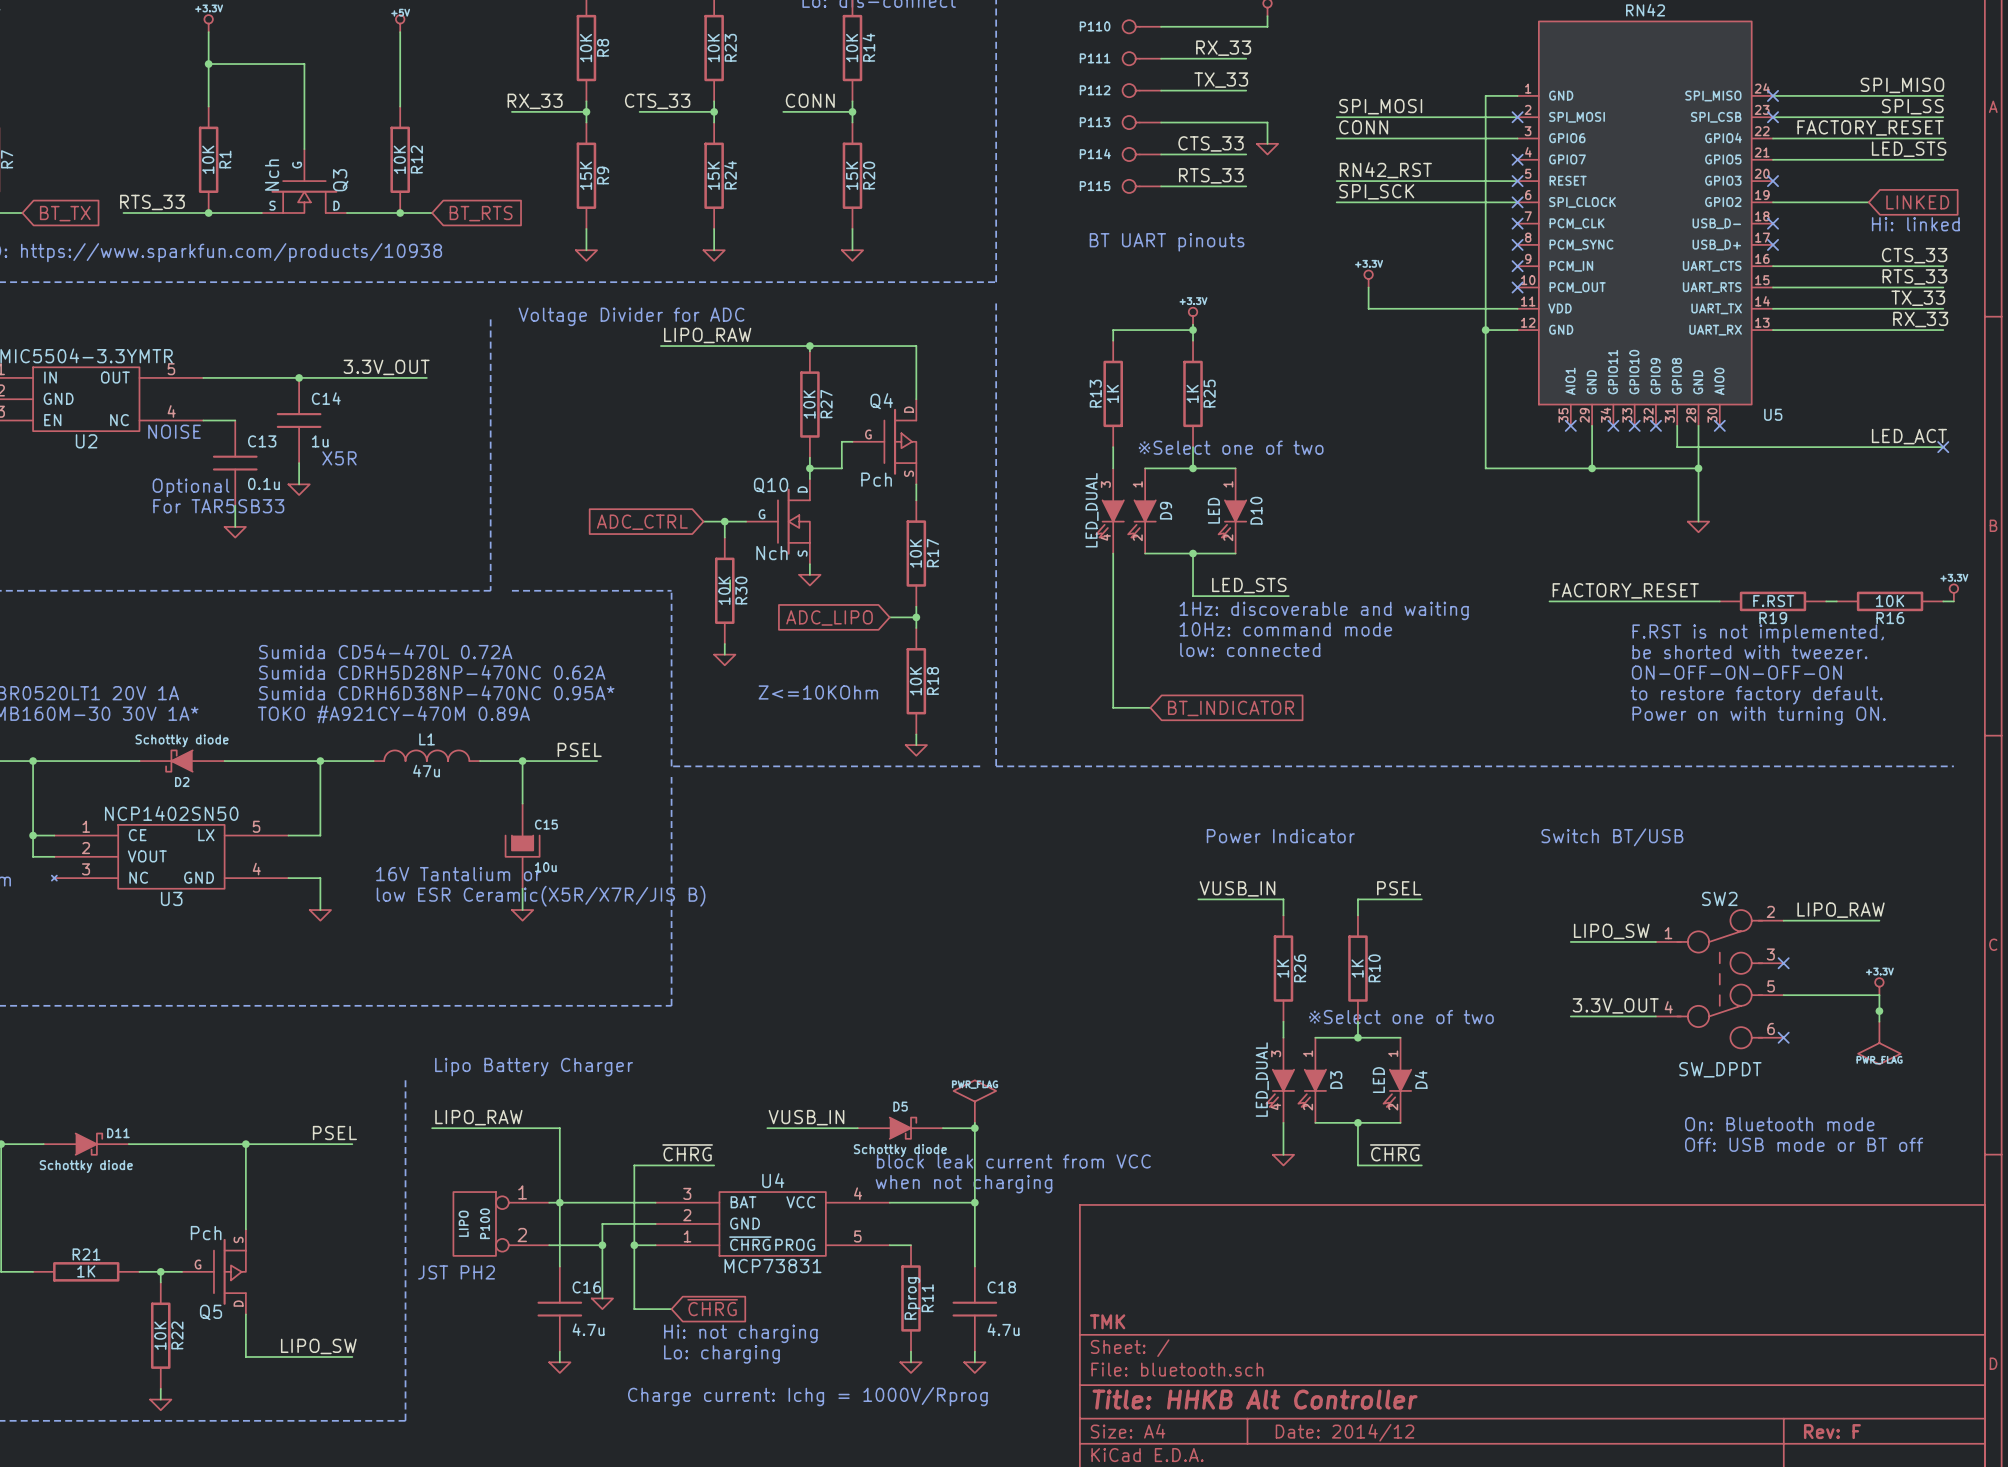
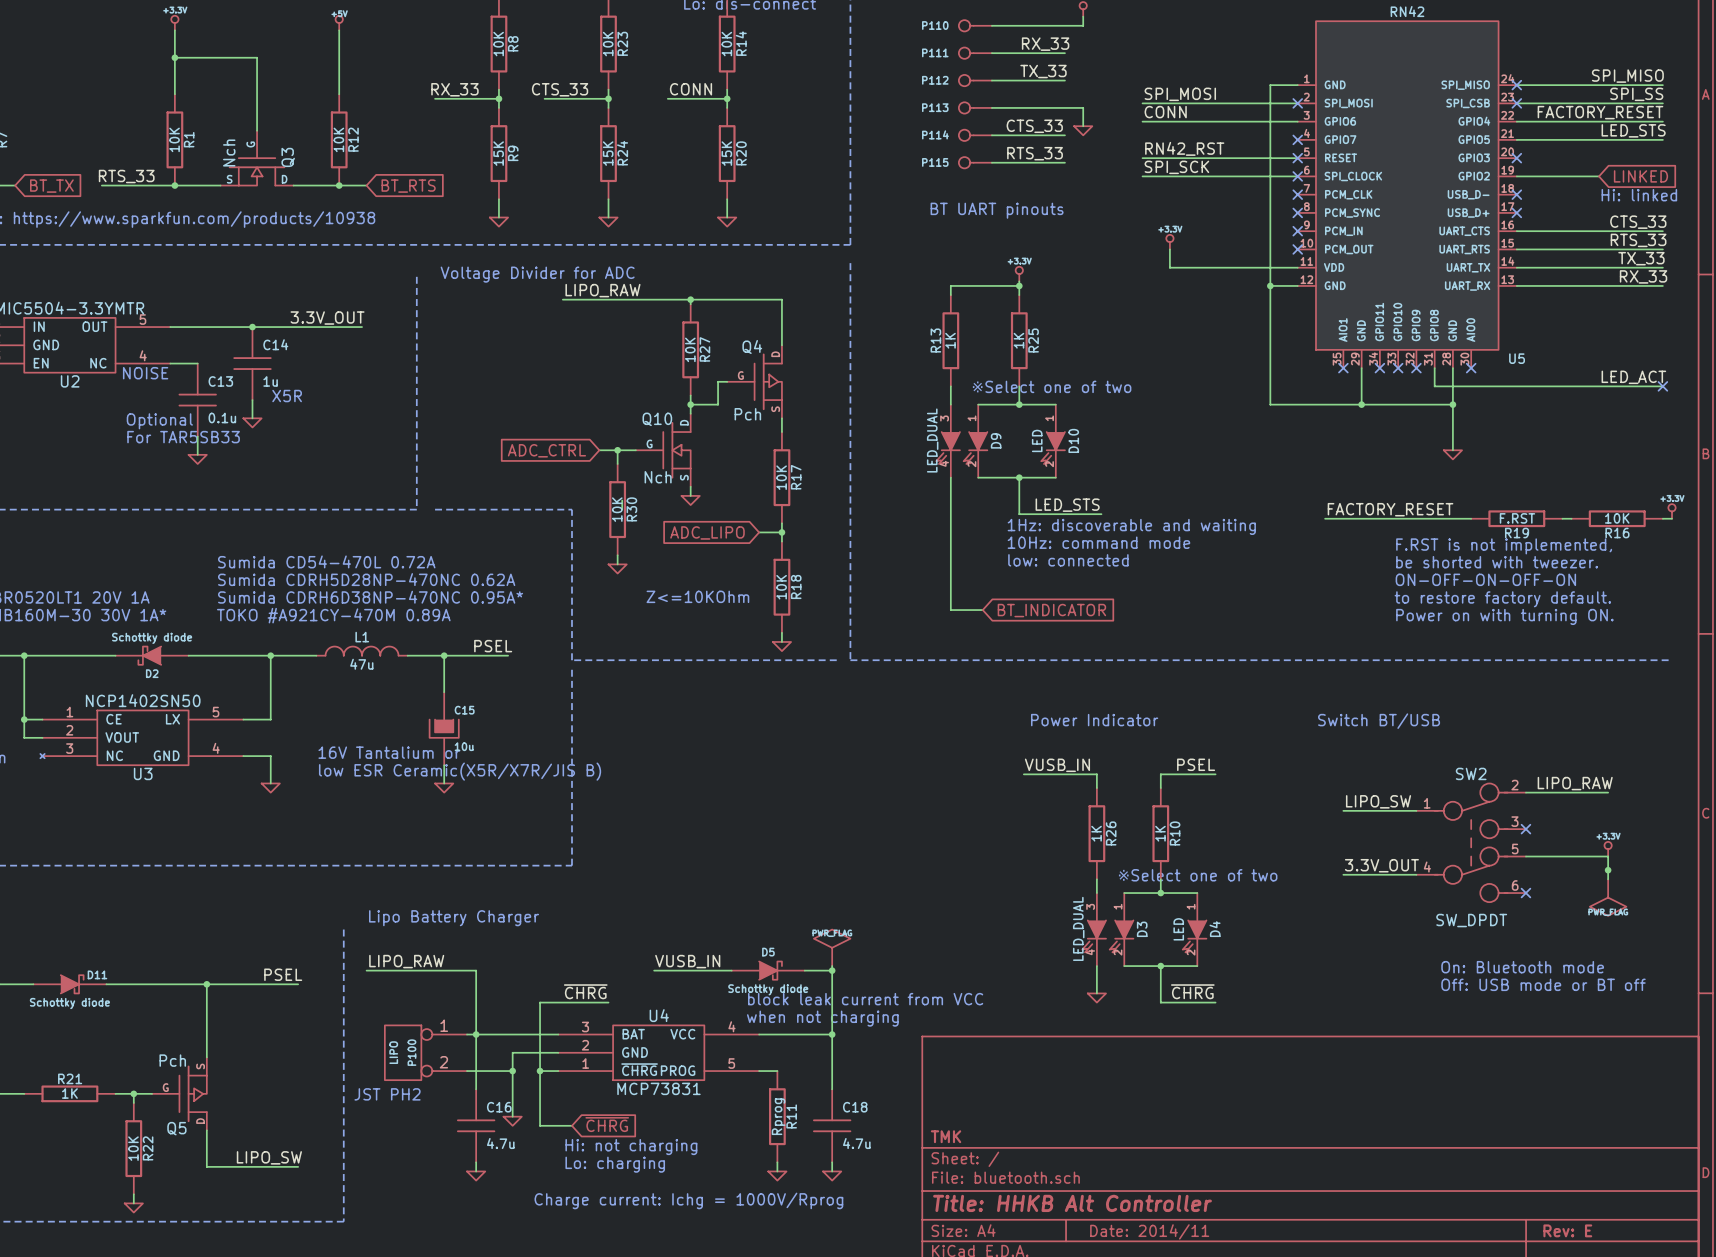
title block: Rev: F (1832, 1431) -> Rev: E (1567, 1230)
title block: Date: 2014/12 (1345, 1432) -> Date: 2014/11 (1149, 1231)

